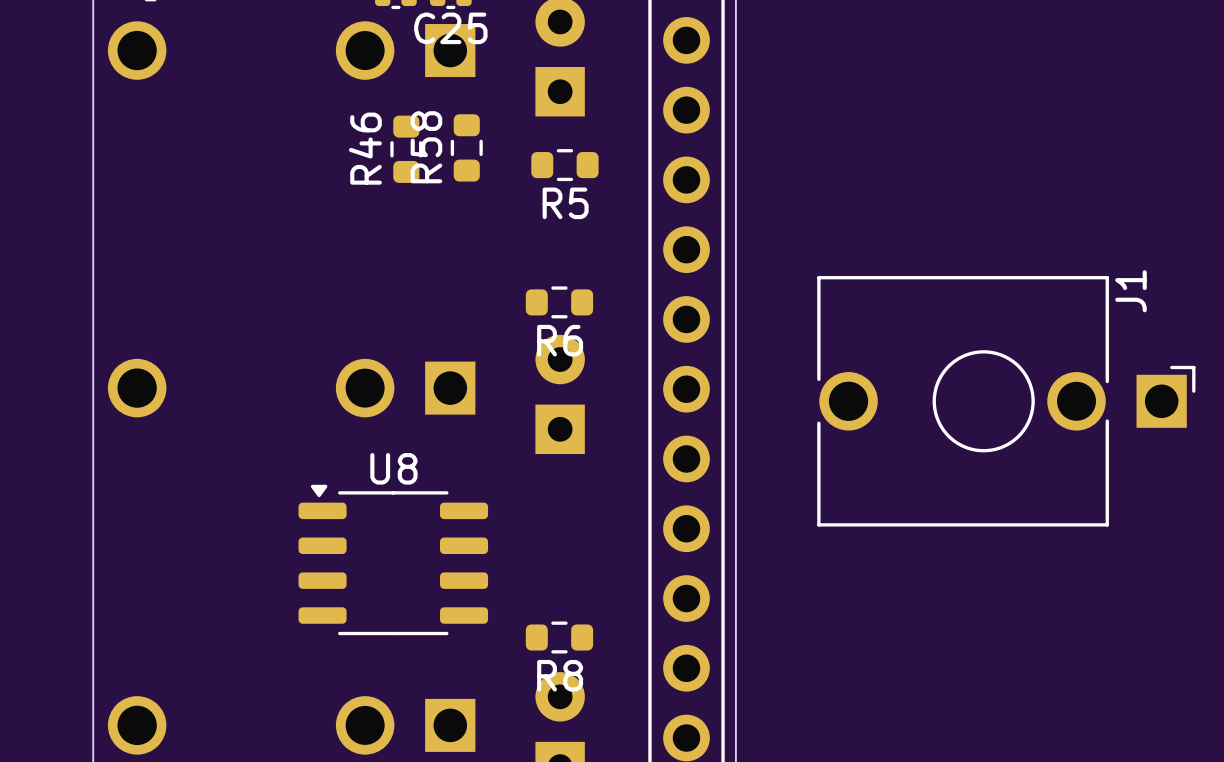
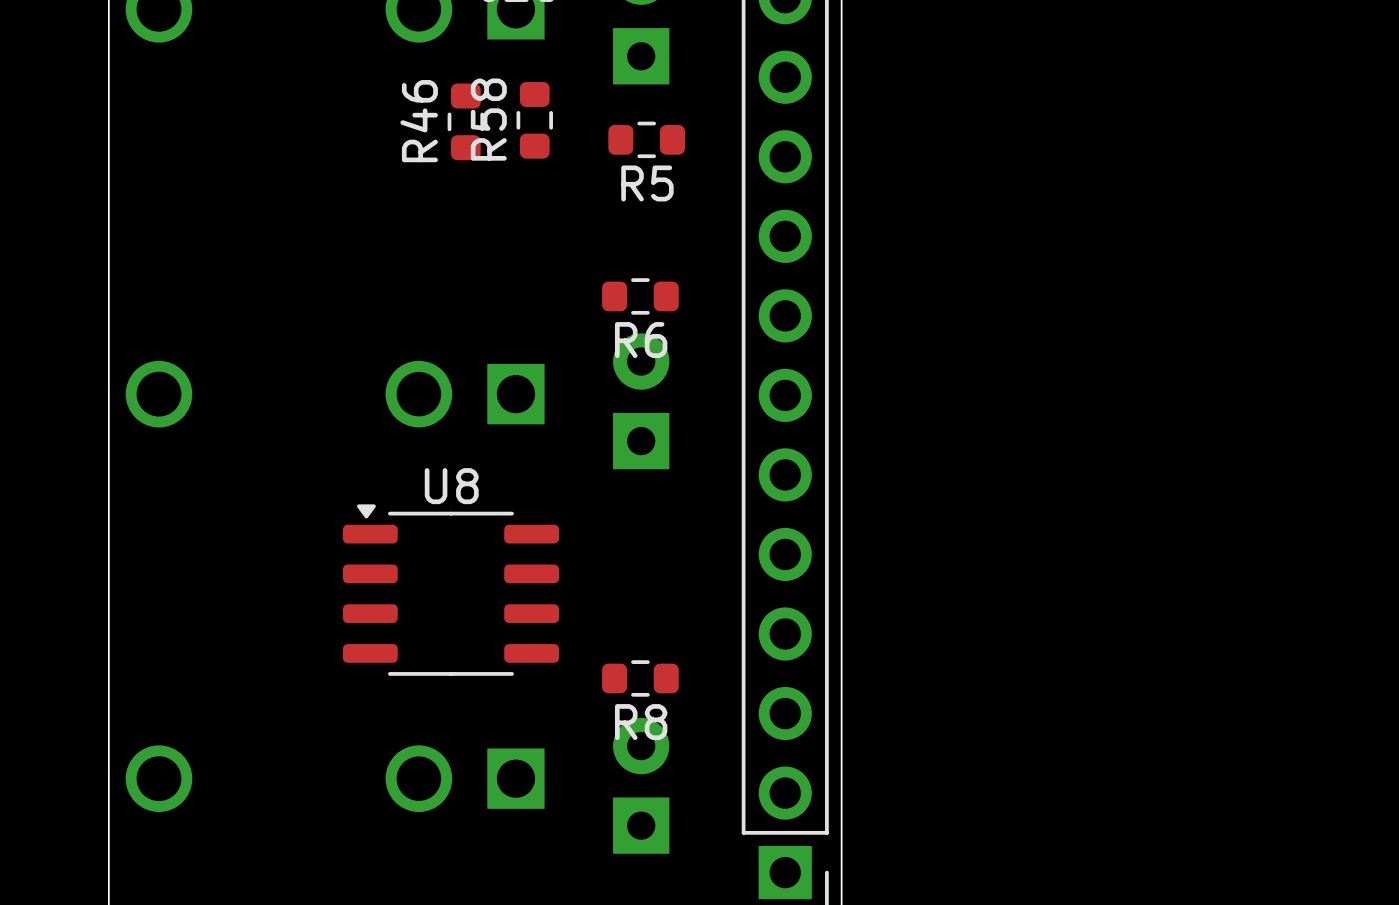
J1: (1006, 401) -> none

